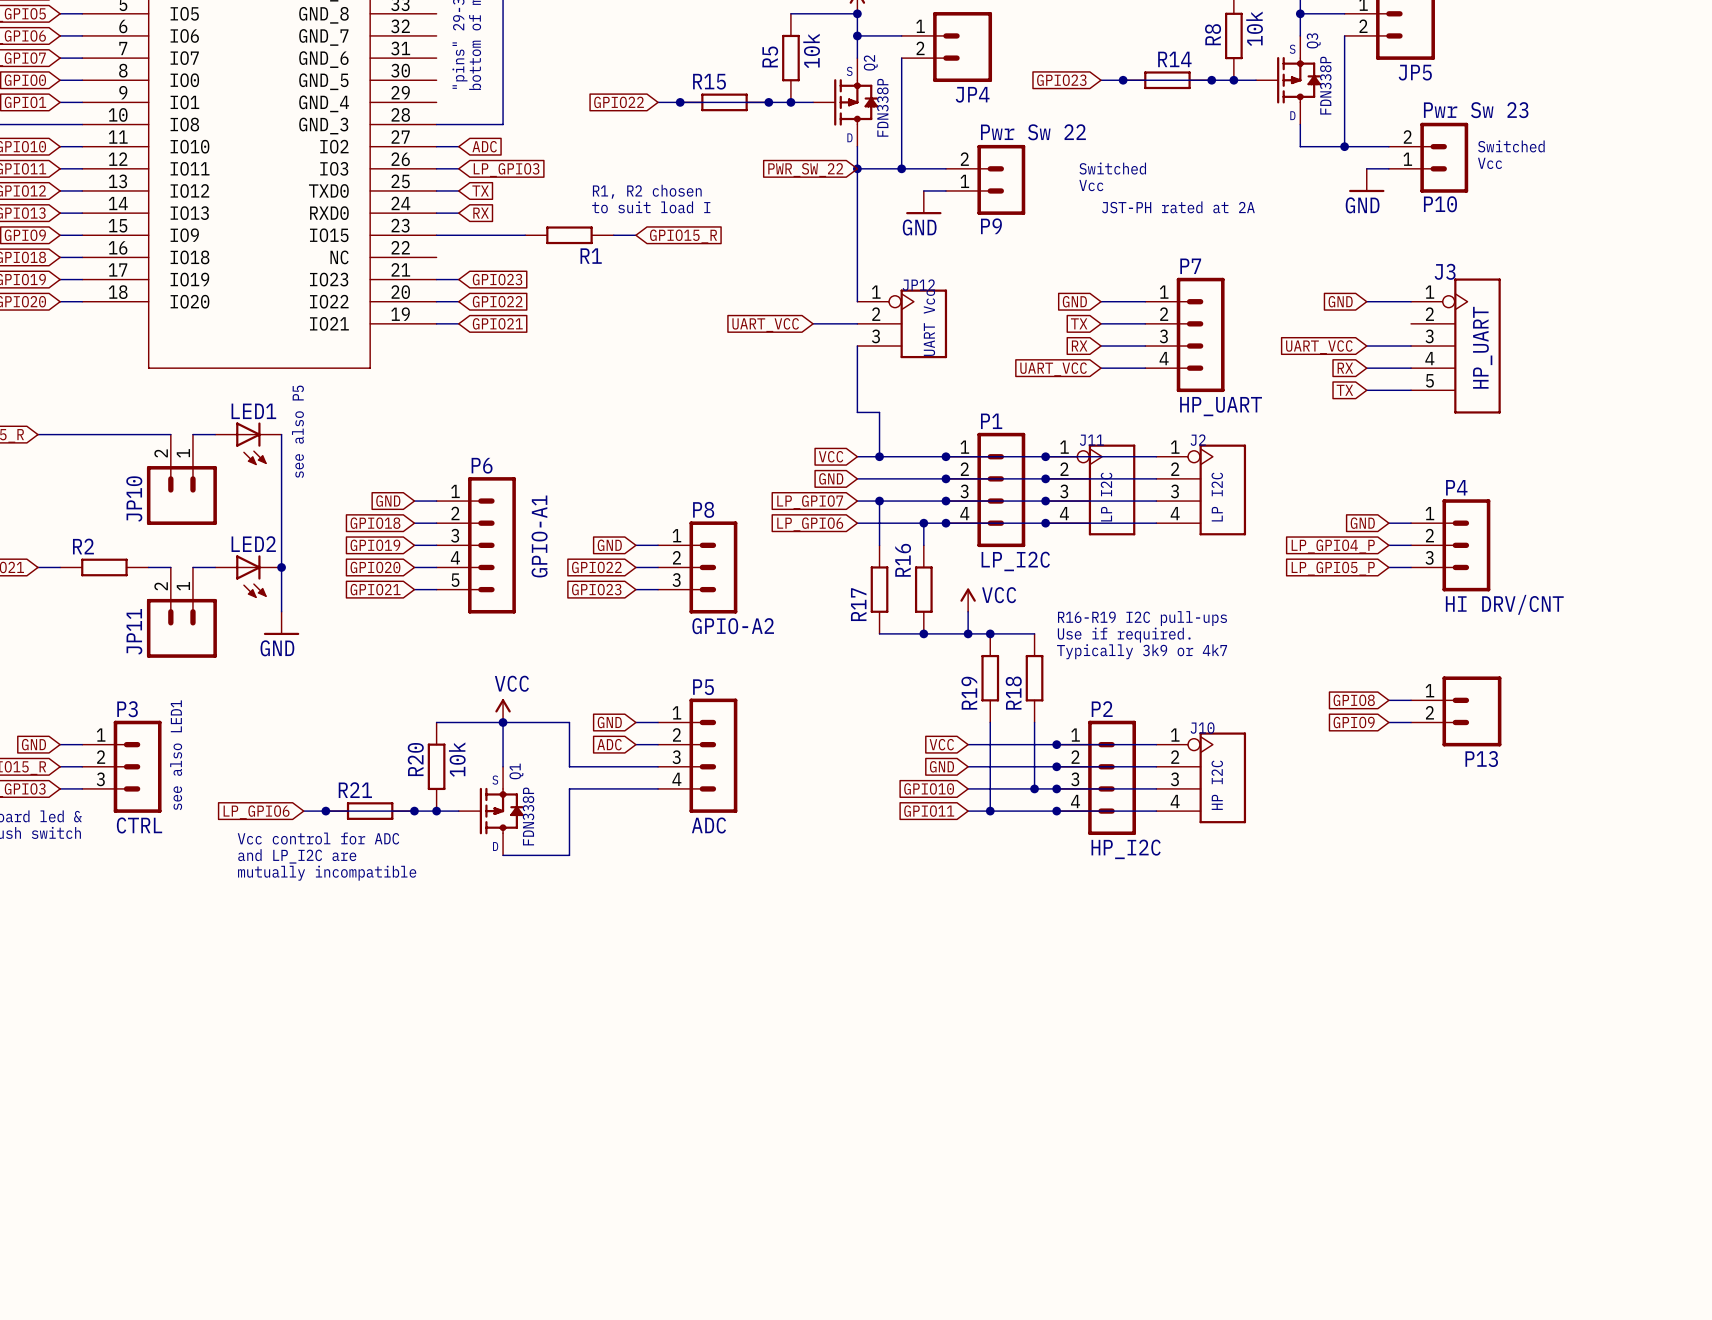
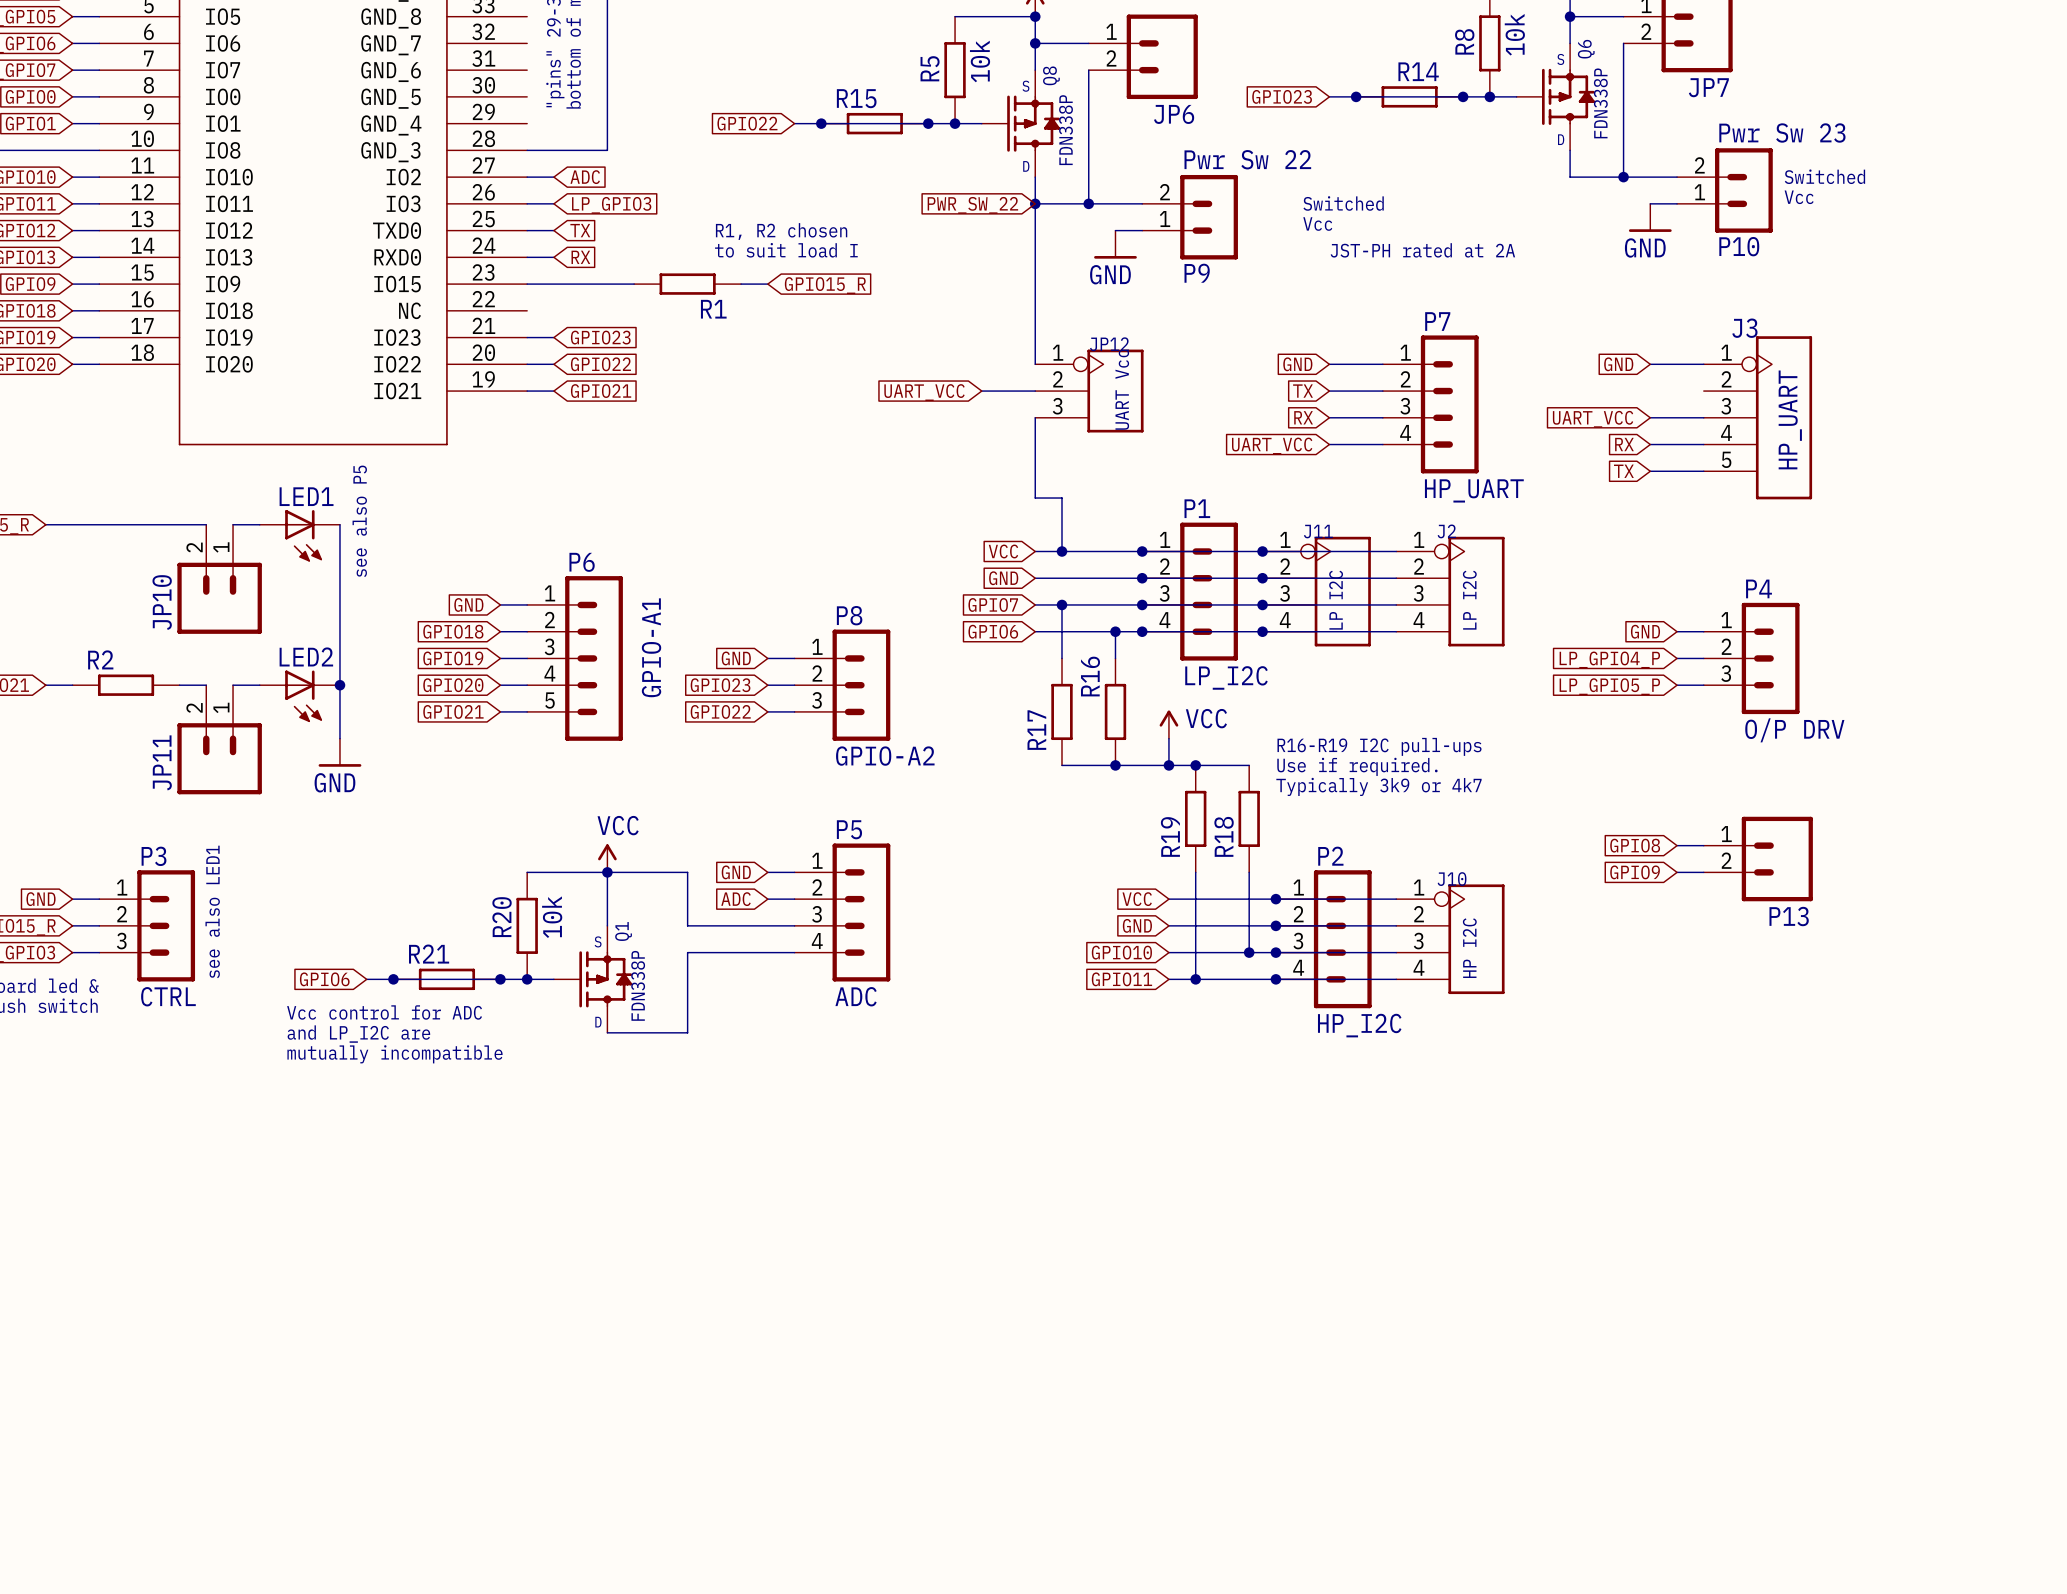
Q3 name: Q3 (1313, 40) -> Q6 (1586, 49)
Q2 name: Q2 (870, 62) -> Q8 (1051, 75)
JP5 name: JP5 (1415, 72) -> JP7 (1708, 87)
JP4 name: JP4 (972, 94) -> JP6 (1174, 114)
global label: LP_GPIO7 (810, 502) -> GPIO7 (993, 604)
global label: LP_GPIO6 (810, 524) -> GPIO6 (993, 631)
global label: GPIO22 (596, 567) -> GPIO23 (720, 685)
global label: GPIO23 (596, 589) -> GPIO22 (720, 711)
P4 value: HI DRV/CNT (1504, 604) -> O/P DRV (1794, 730)
global label: LP_GPIO6 (256, 812) -> GPIO6 (324, 979)

